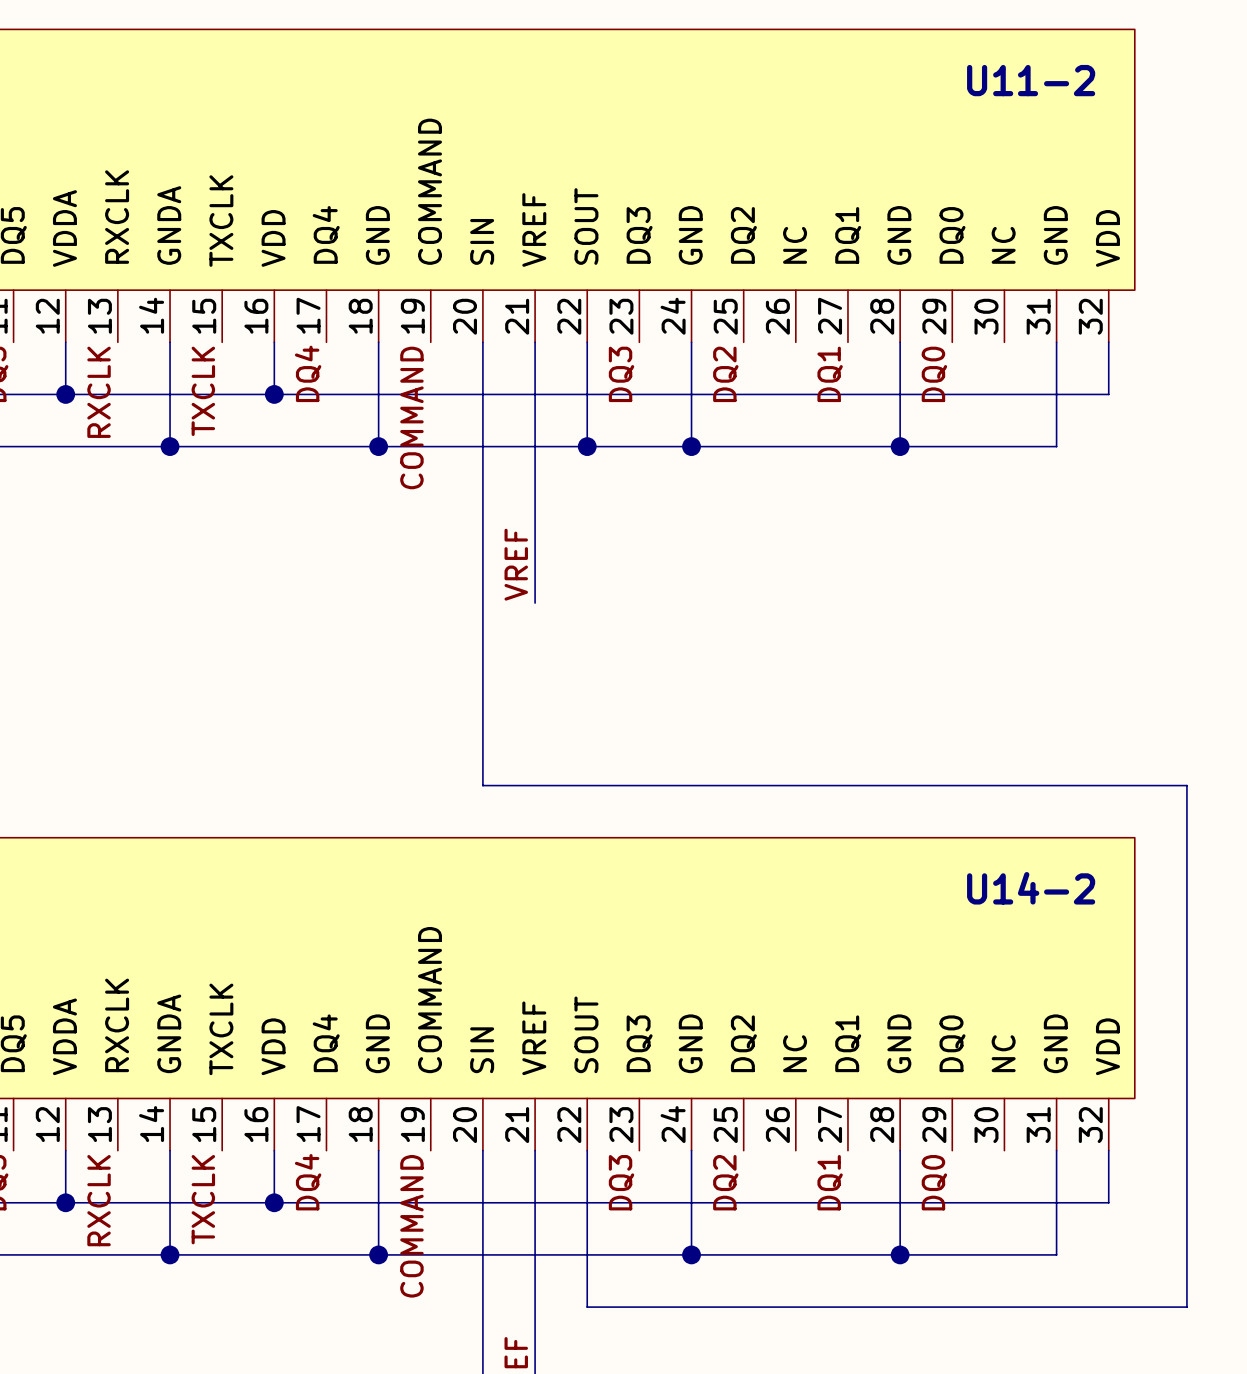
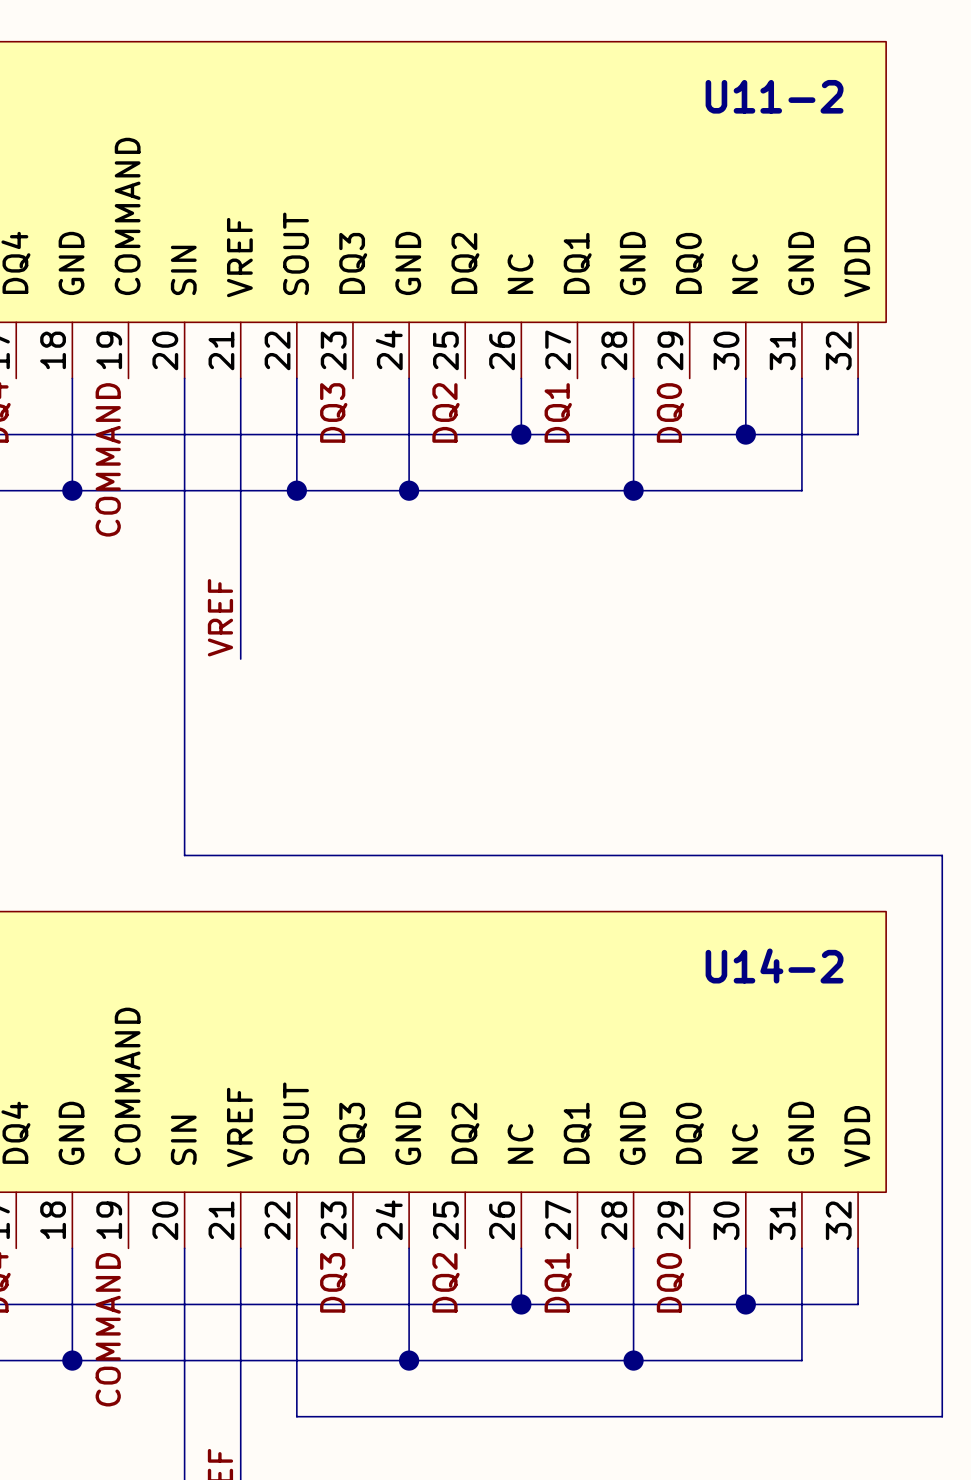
wire: none -> (521, 378) (521, 434)
wire: none -> (745, 378) (745, 434)
junction: none -> (521, 434)
junction: none -> (745, 434)
wire: none -> (521, 1248) (521, 1304)
wire: none -> (745, 1248) (745, 1304)
junction: none -> (521, 1304)
junction: none -> (745, 1304)

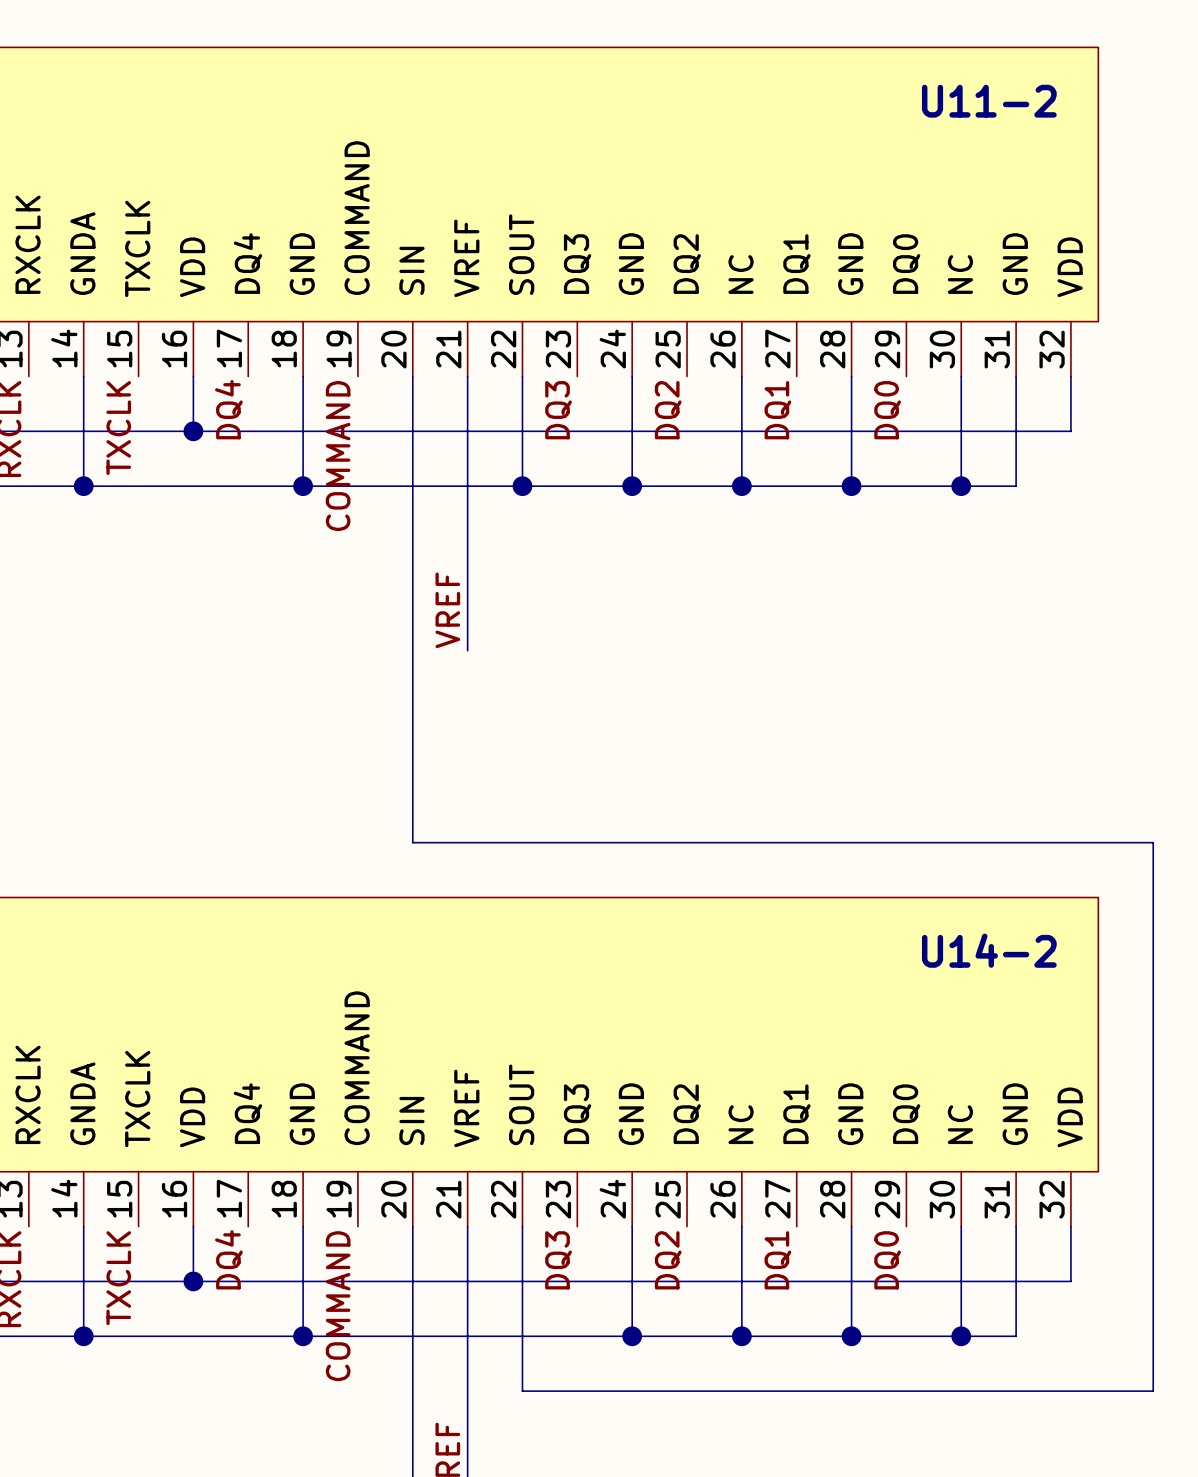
wire: none -> (741, 431) (741, 486)
junction position: (521, 434) -> (741, 486)
wire: none -> (961, 431) (961, 486)
junction position: (745, 434) -> (961, 486)
wire: none -> (741, 1281) (741, 1336)
junction position: (521, 1304) -> (741, 1336)
wire: none -> (961, 1281) (961, 1336)
junction position: (745, 1304) -> (961, 1336)

